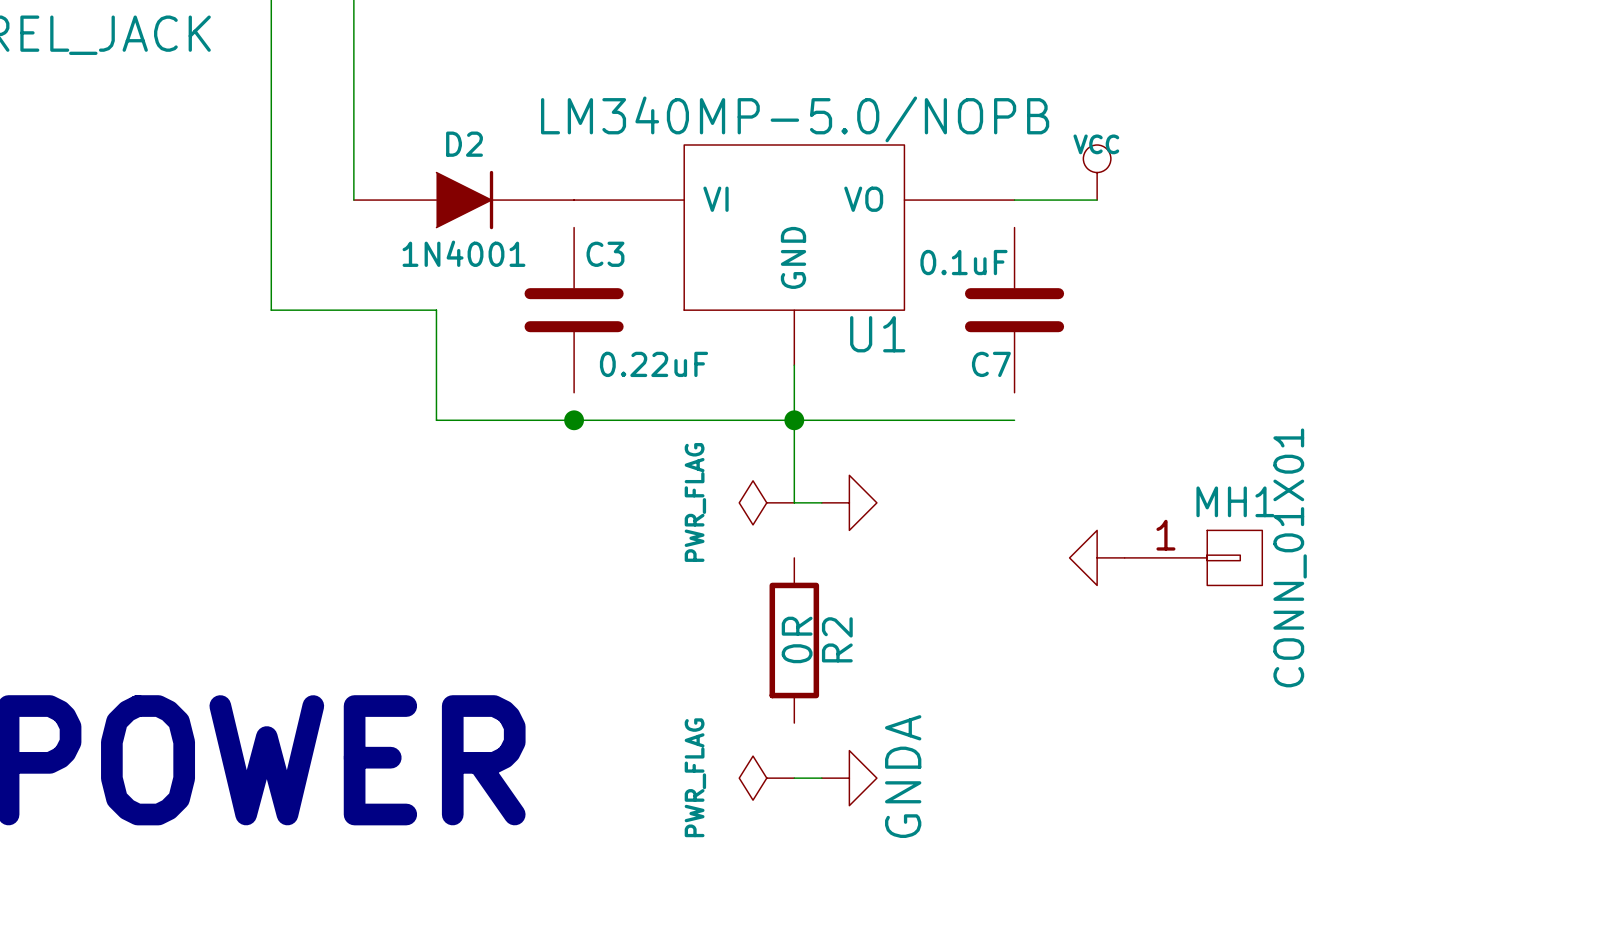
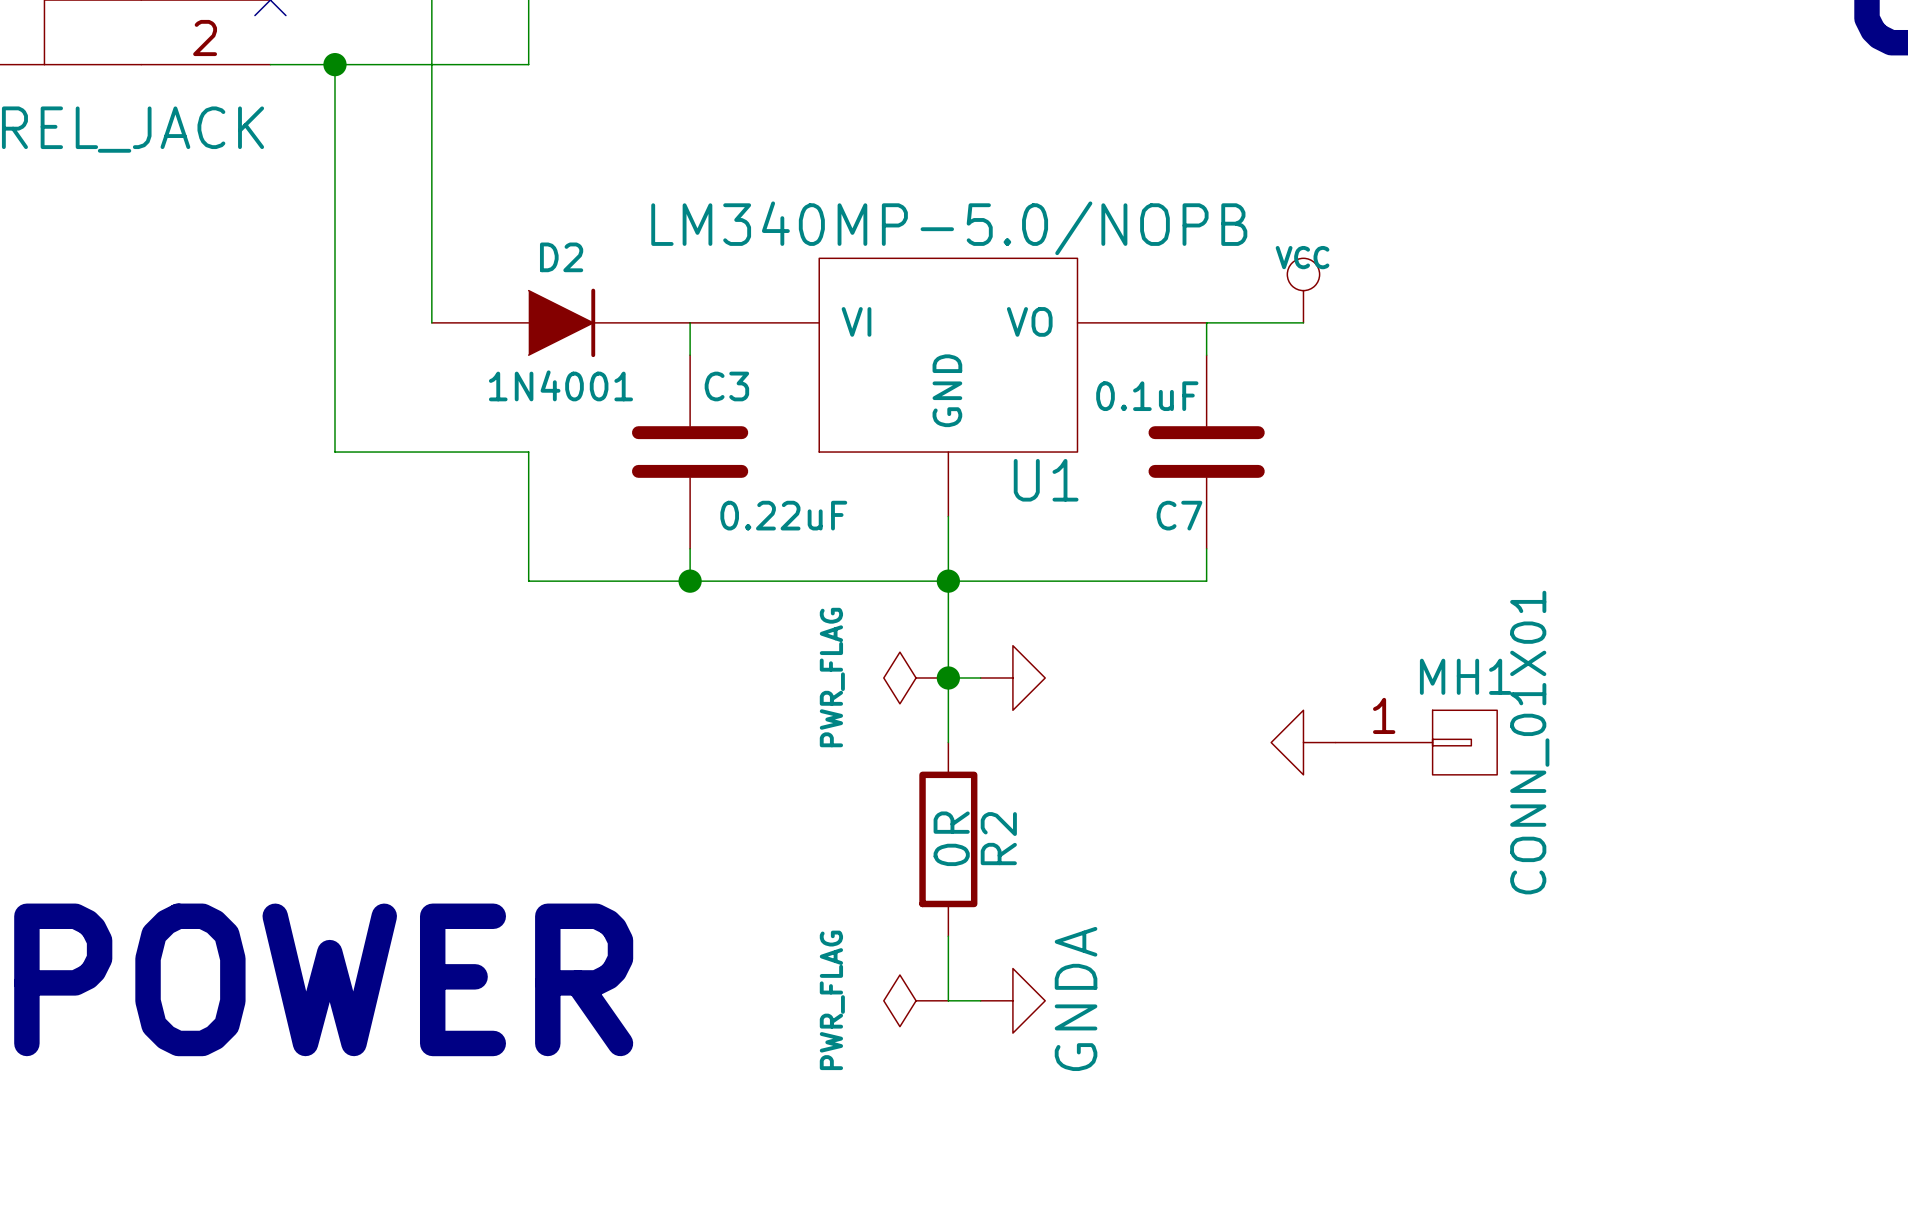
wire: none -> (690, 322) (690, 355)
wire: none -> (1206, 322) (1206, 355)
wire: none -> (690, 548) (690, 581)
wire: none -> (1206, 548) (1206, 581)
wire: none -> (948, 677) (948, 742)
junction: none -> (948, 677)
wire: none -> (948, 936) (948, 1000)

